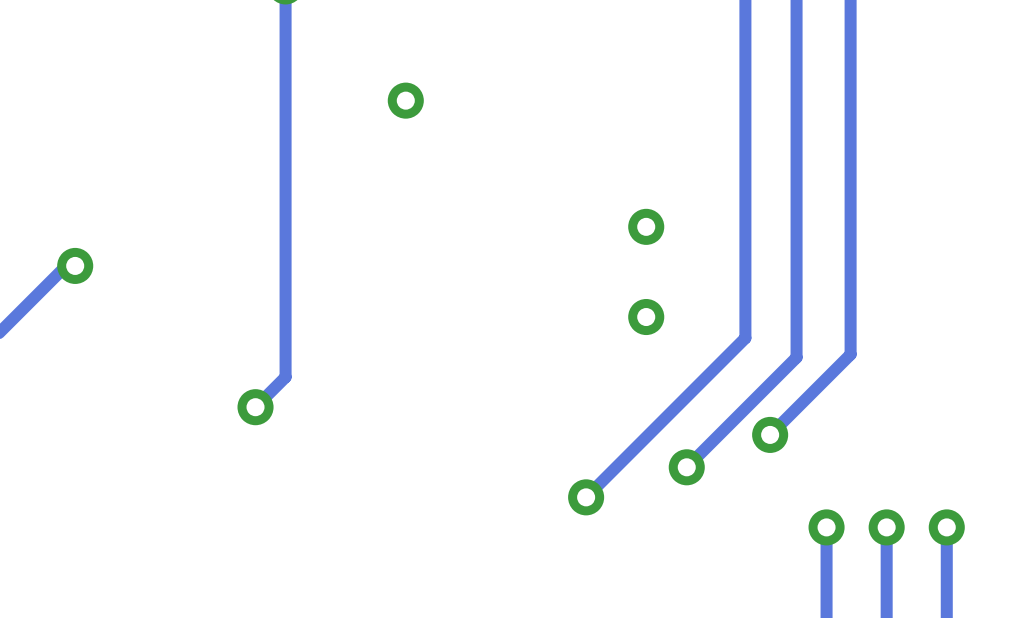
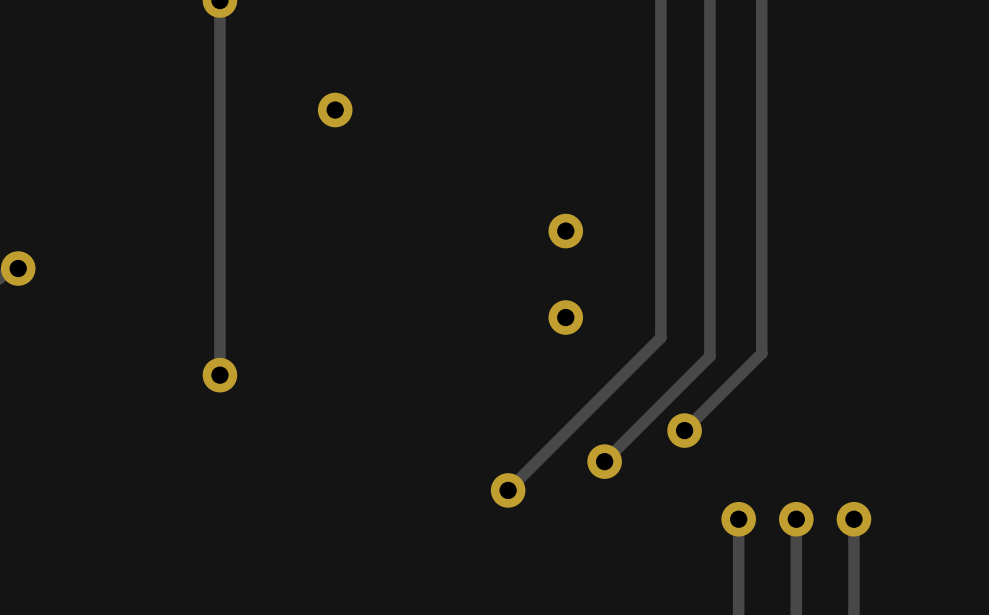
track: (285, 377) (255, 407) -> none
via position: (255, 407) -> (219, 375)

